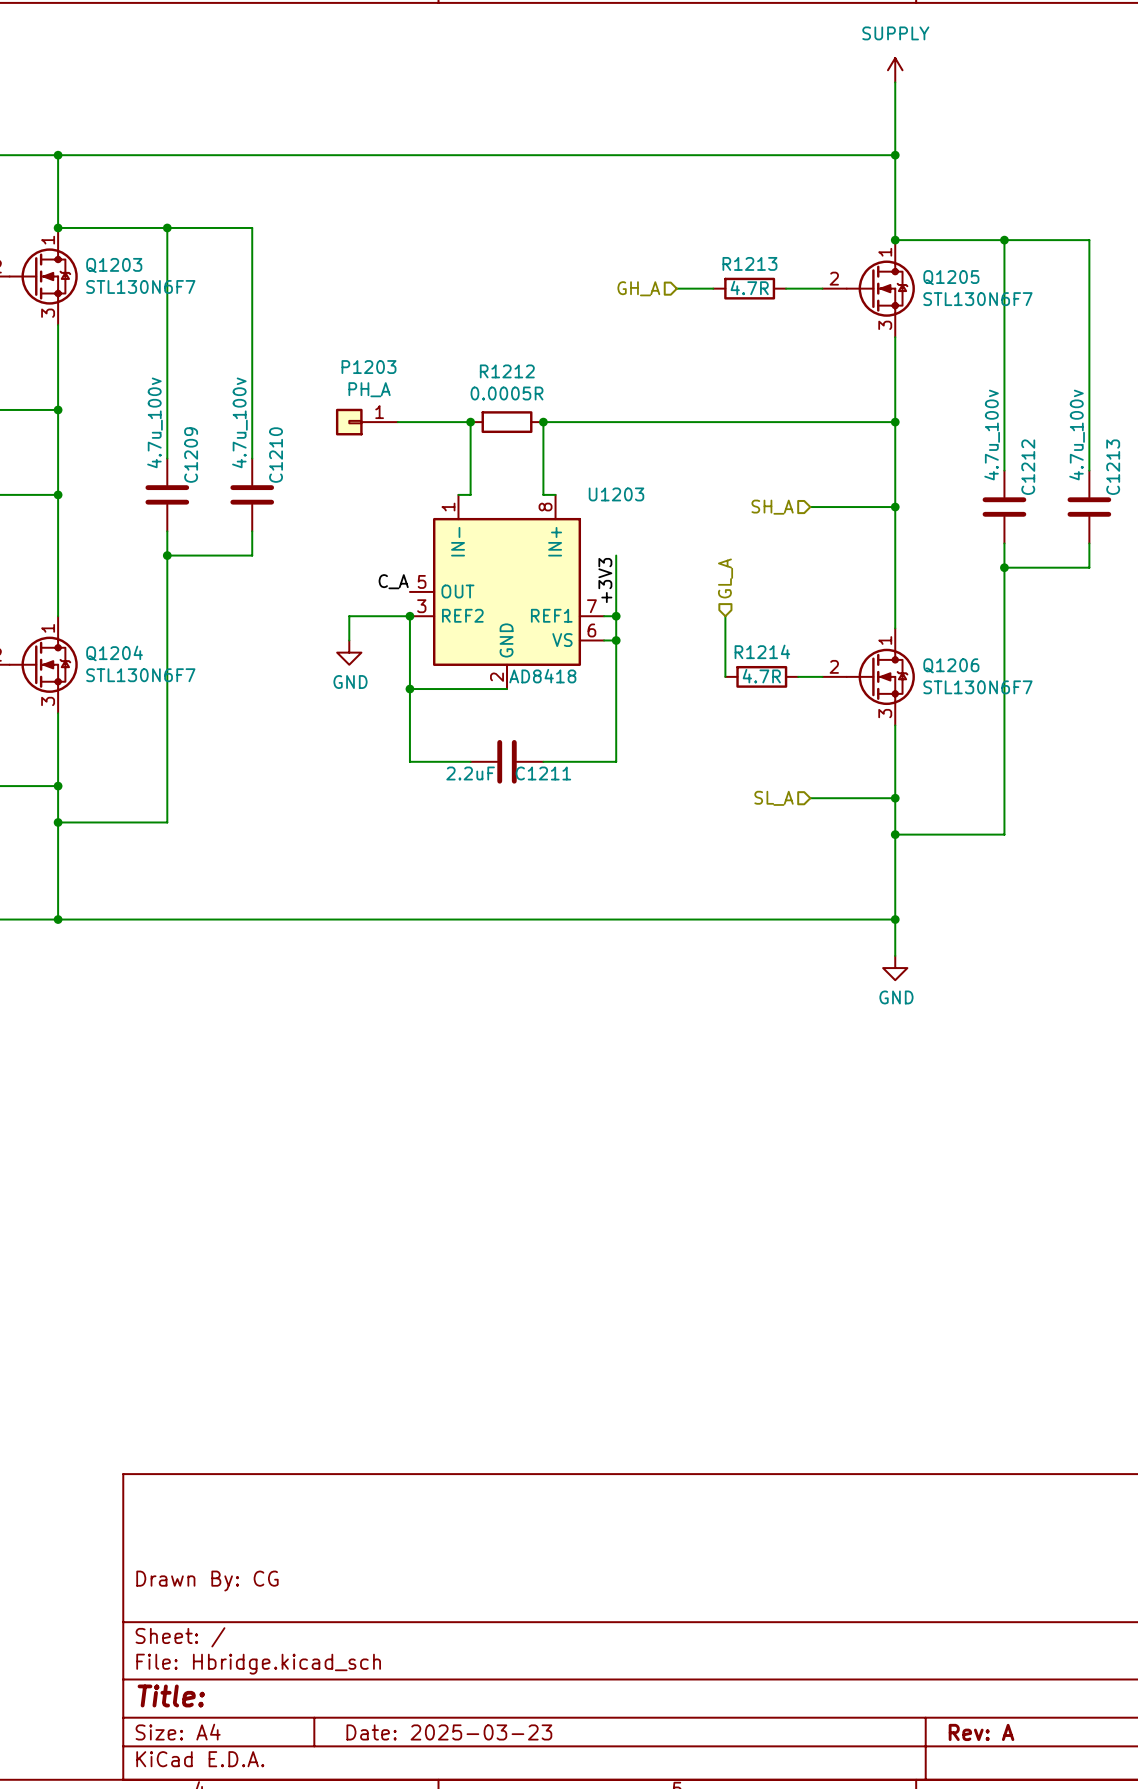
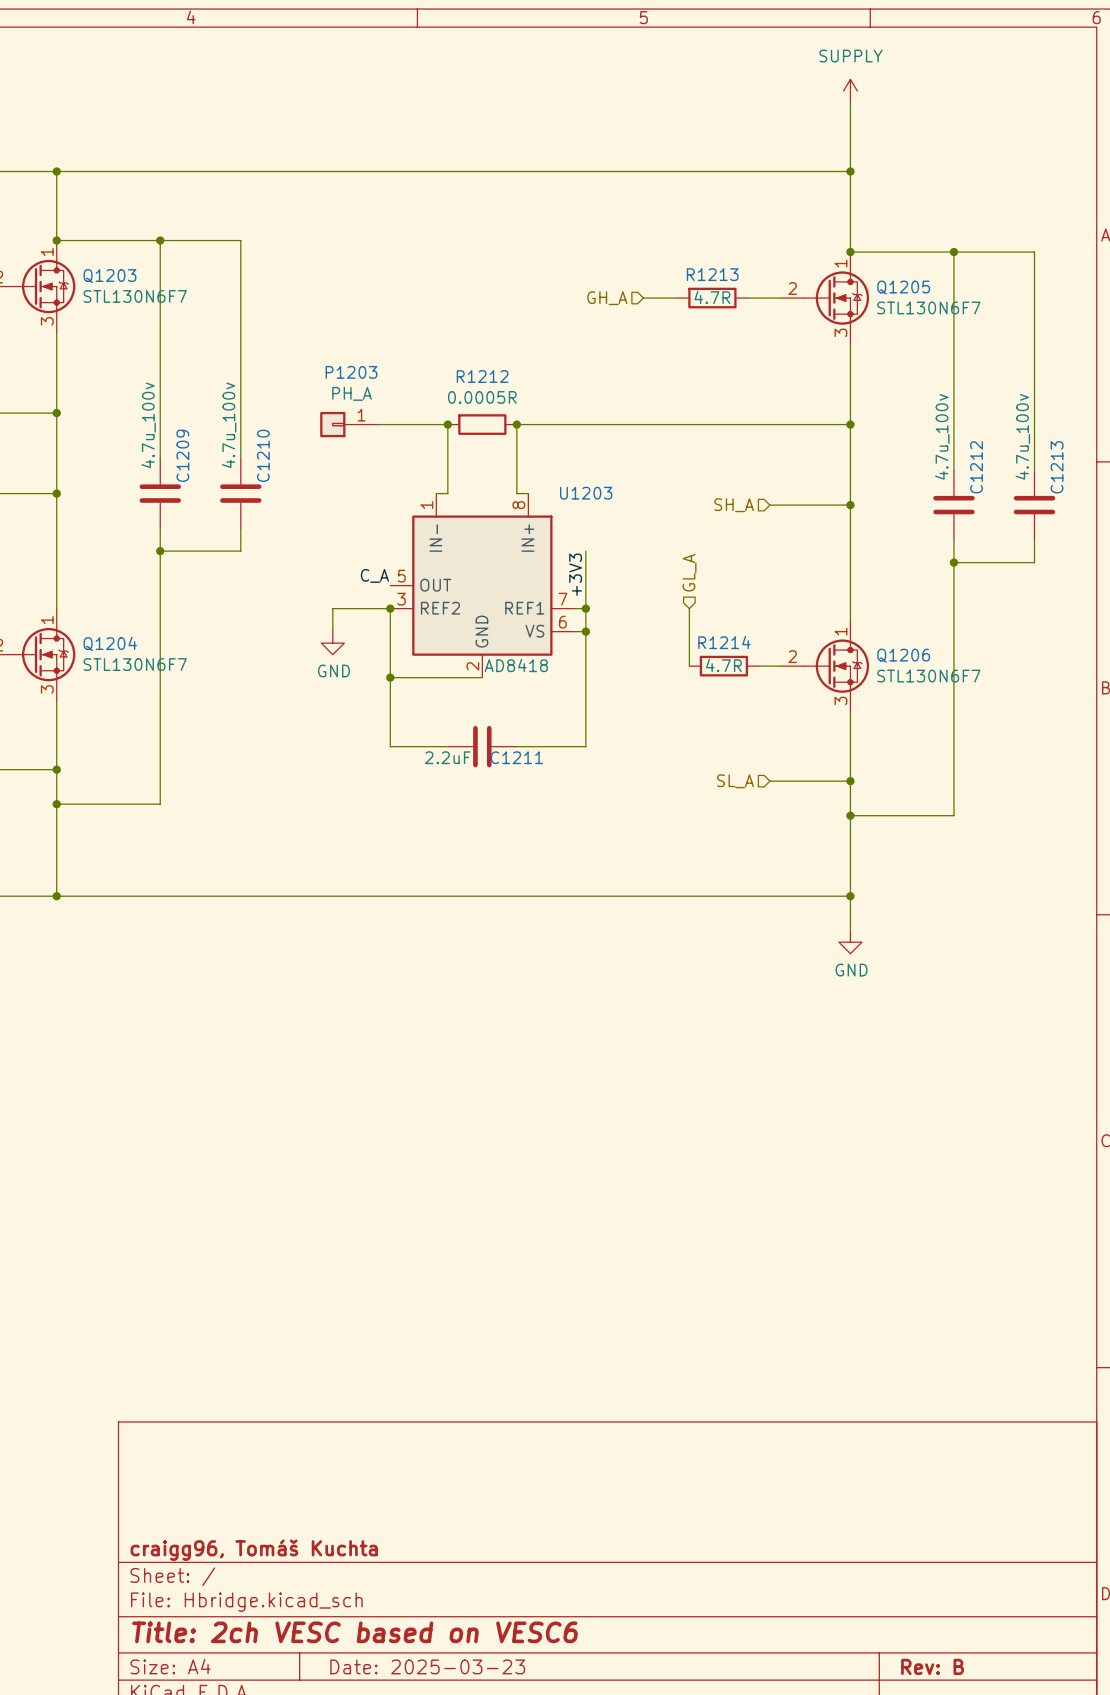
title block: Drawn By: CG (207, 1581) -> none
title block: none -> craigg96, Tomáš Kuchta (254, 1550)
title block: Title: (171, 1695) -> Title: 2ch VESC based on VESC6 (354, 1632)
title block: Rev: A (981, 1732) -> Rev: B (932, 1666)

